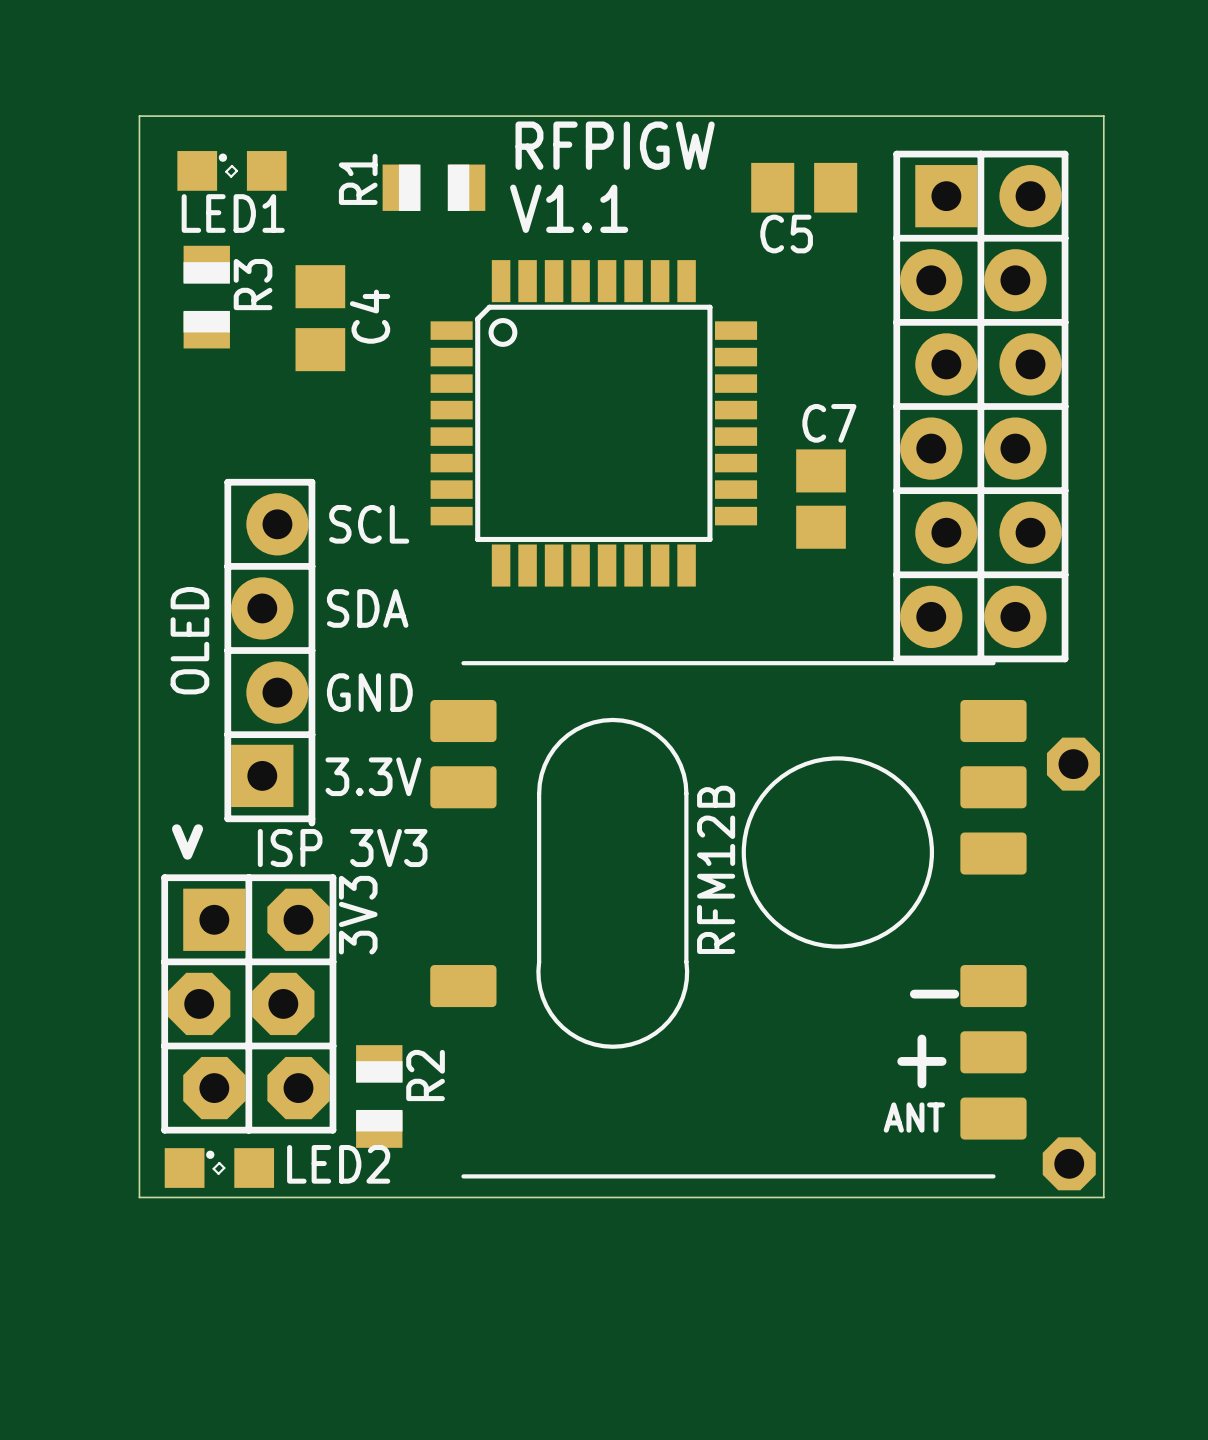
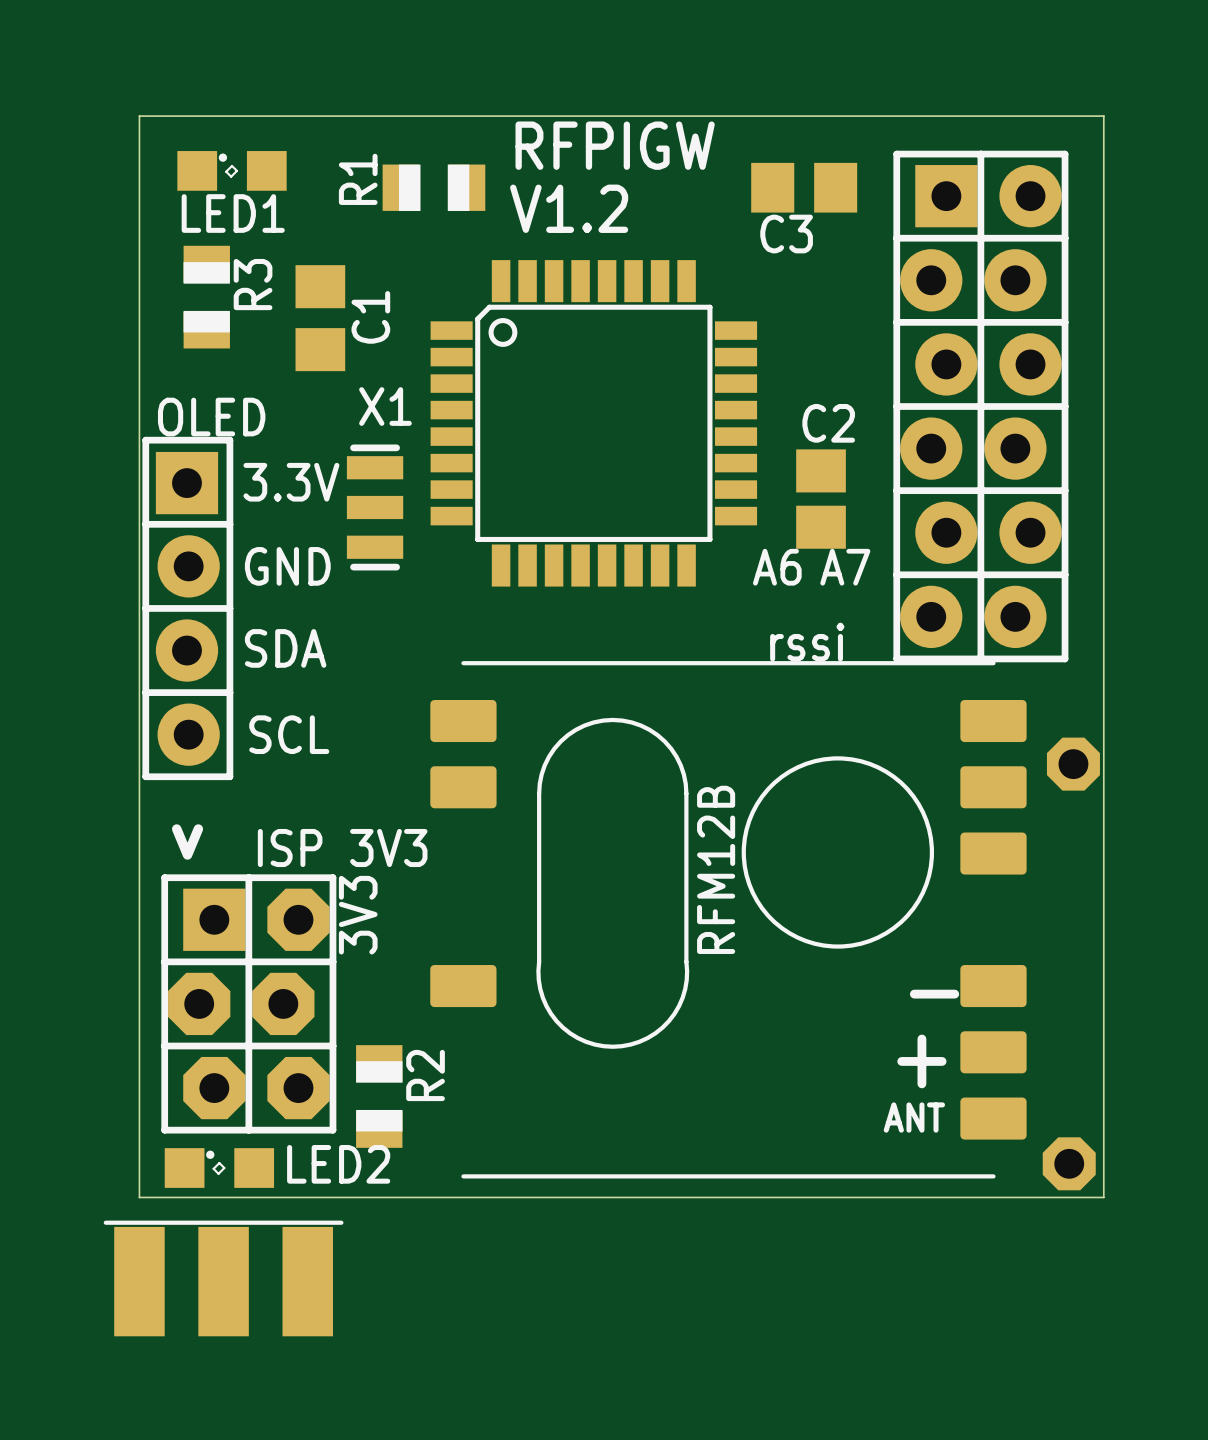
text: V1.1 (569, 208) -> V1.2 (569, 208)
C5 name: C5 (786, 234) -> C3 (786, 234)
C4 name: C4 (370, 316) -> C1 (370, 317)
C7 name: C7 (829, 423) -> C2 (828, 423)
X1: none -> (375, 507)
text position: SCL (369, 524) -> SCL (289, 734)
text: none -> A6 (777, 567)
text: none -> A7 (845, 567)
OLED: none -> (187, 608)
text position: SDA (367, 608) -> SDA (285, 648)
text: none -> rssi (807, 642)
OLED: (269, 652) -> none
text position: GND (369, 692) -> GND (287, 566)
text position: 3.3V (373, 776) -> 3.3V (291, 482)
part: none -> (223, 1278)

